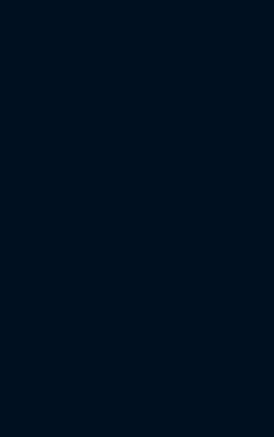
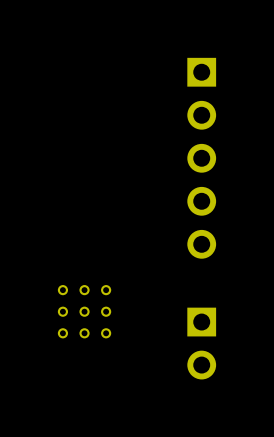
part: none -> (201, 158)
part: none -> (84, 311)
part: none -> (201, 343)

